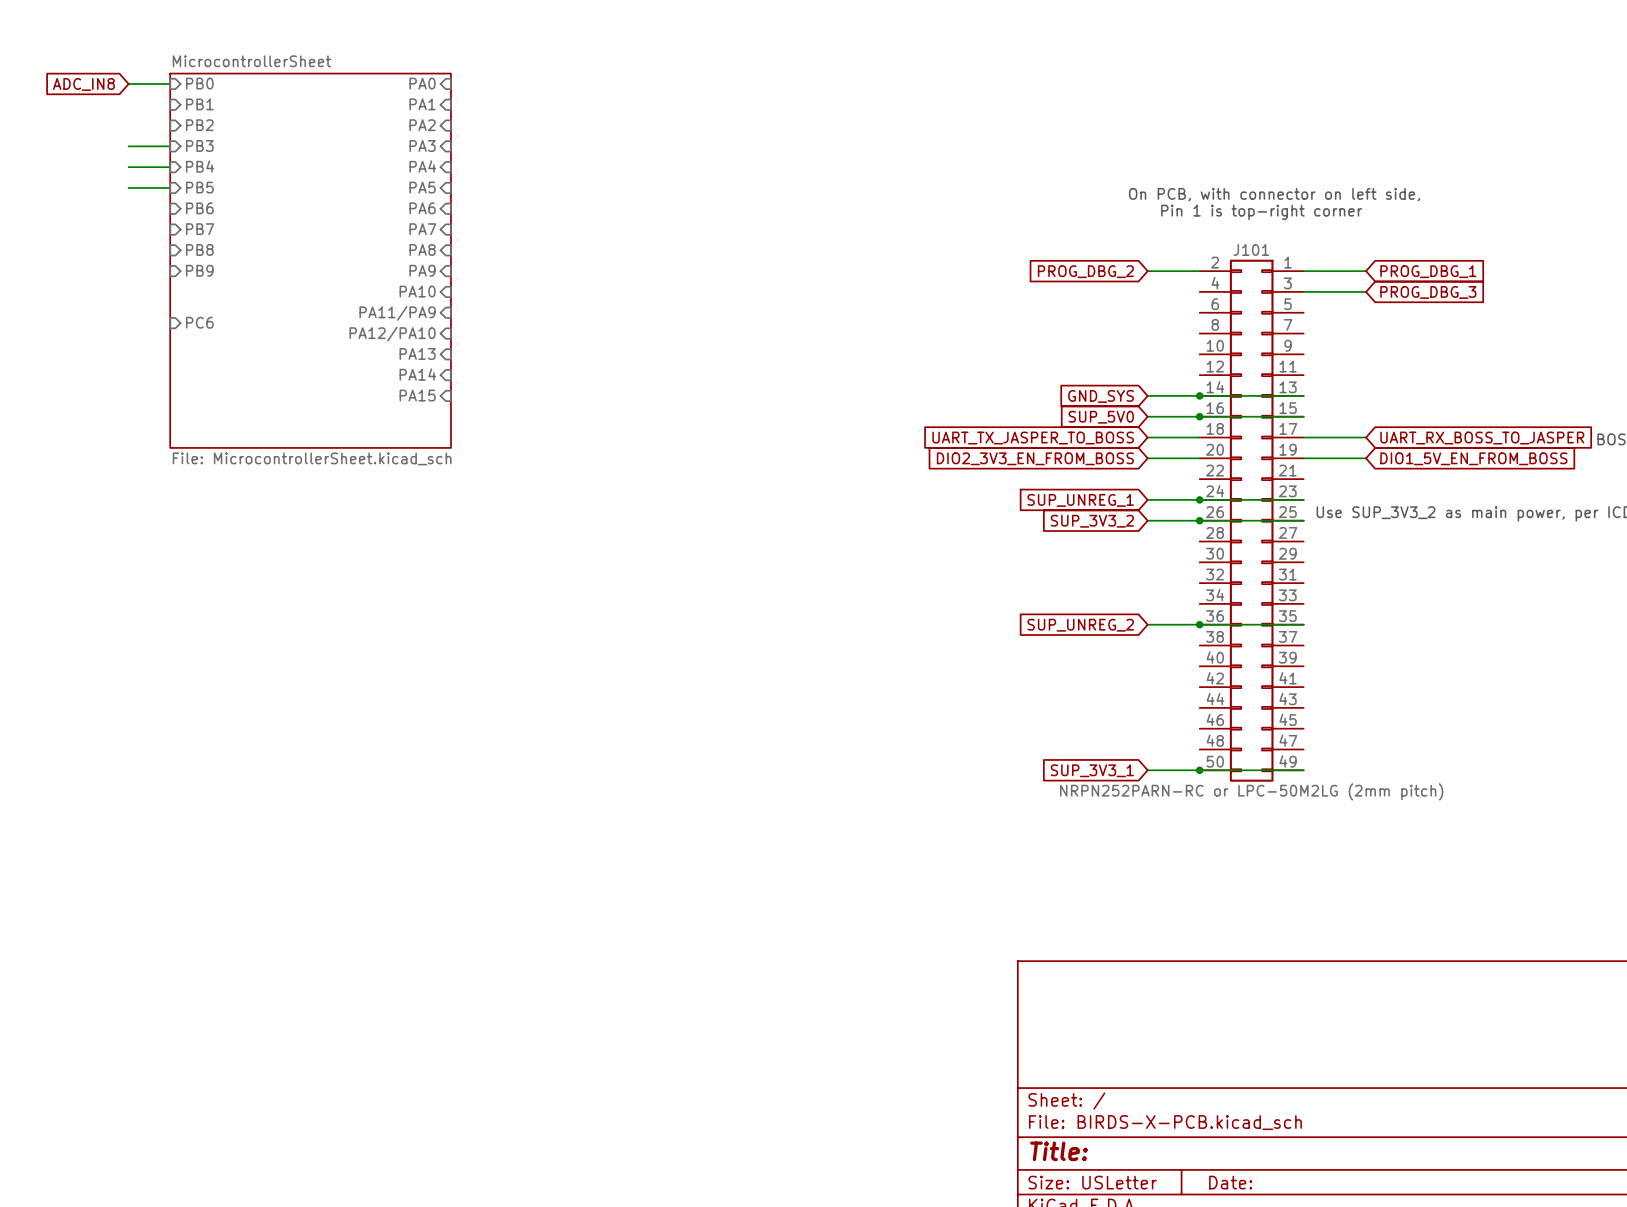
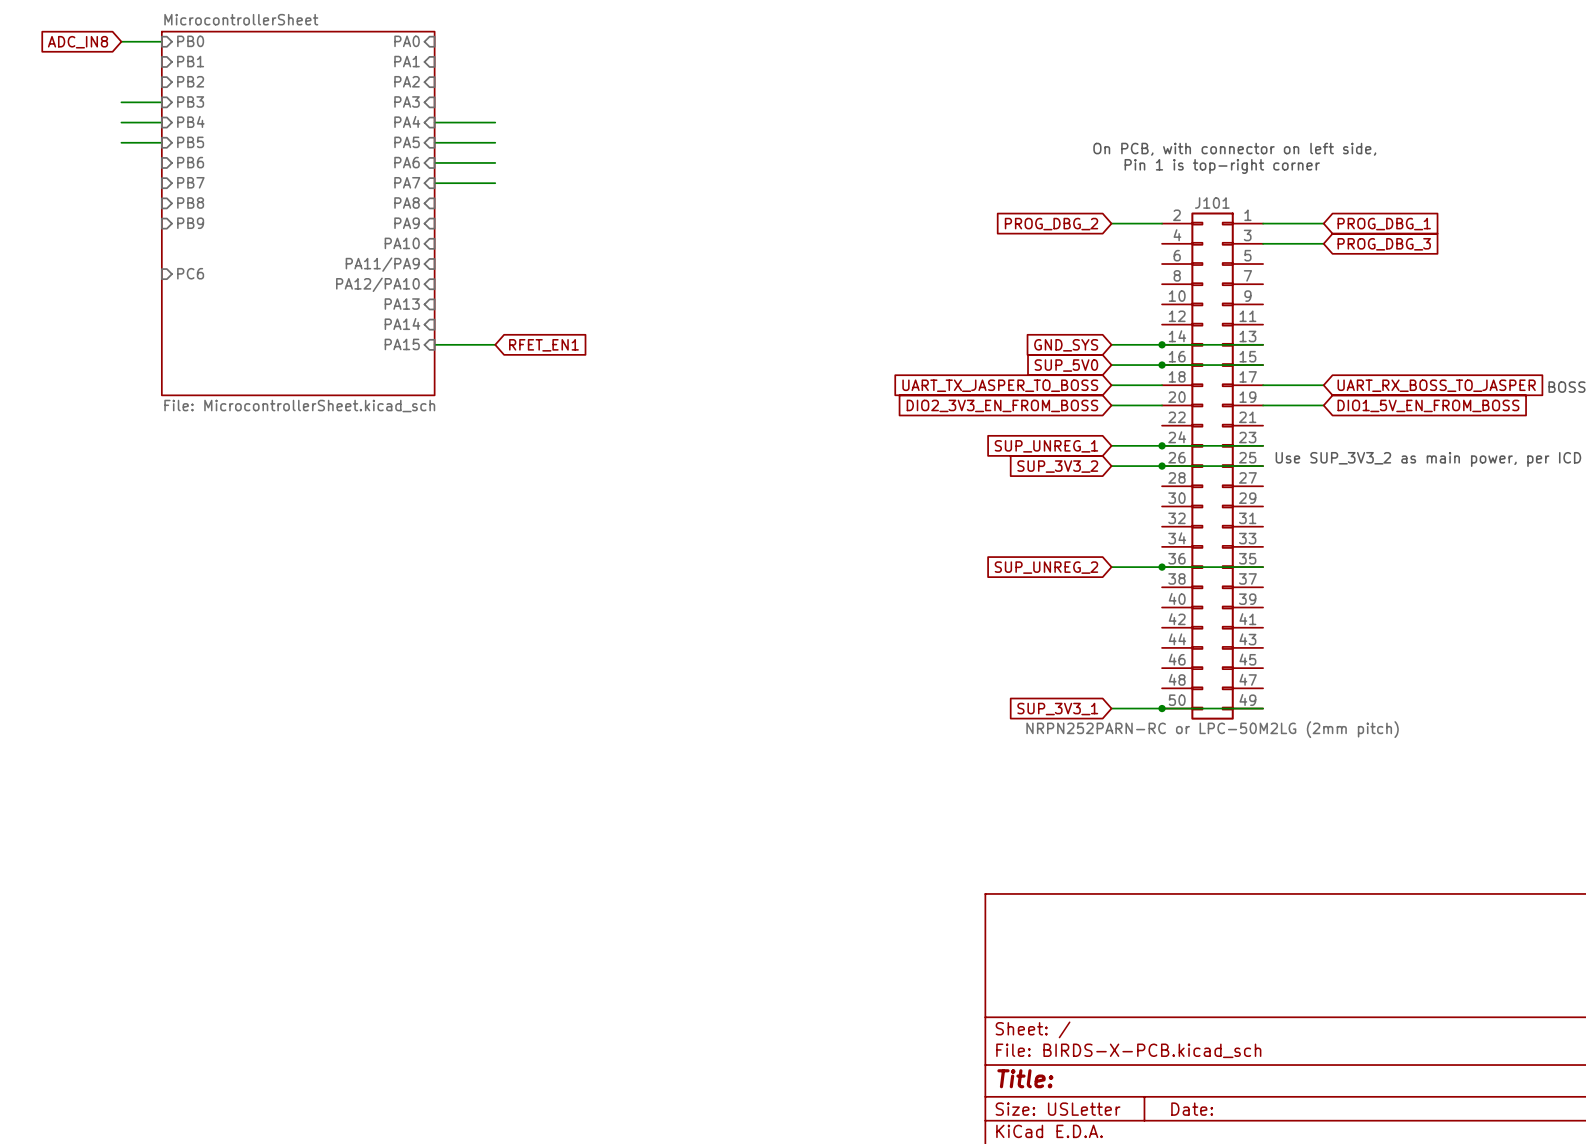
wire: none -> (434, 122) (495, 122)
wire: none -> (434, 142) (495, 142)
wire: none -> (434, 162) (495, 162)
wire: none -> (434, 183) (495, 183)
wire: none -> (434, 344) (495, 344)
global label: none -> RFET_EN1 (543, 345)

